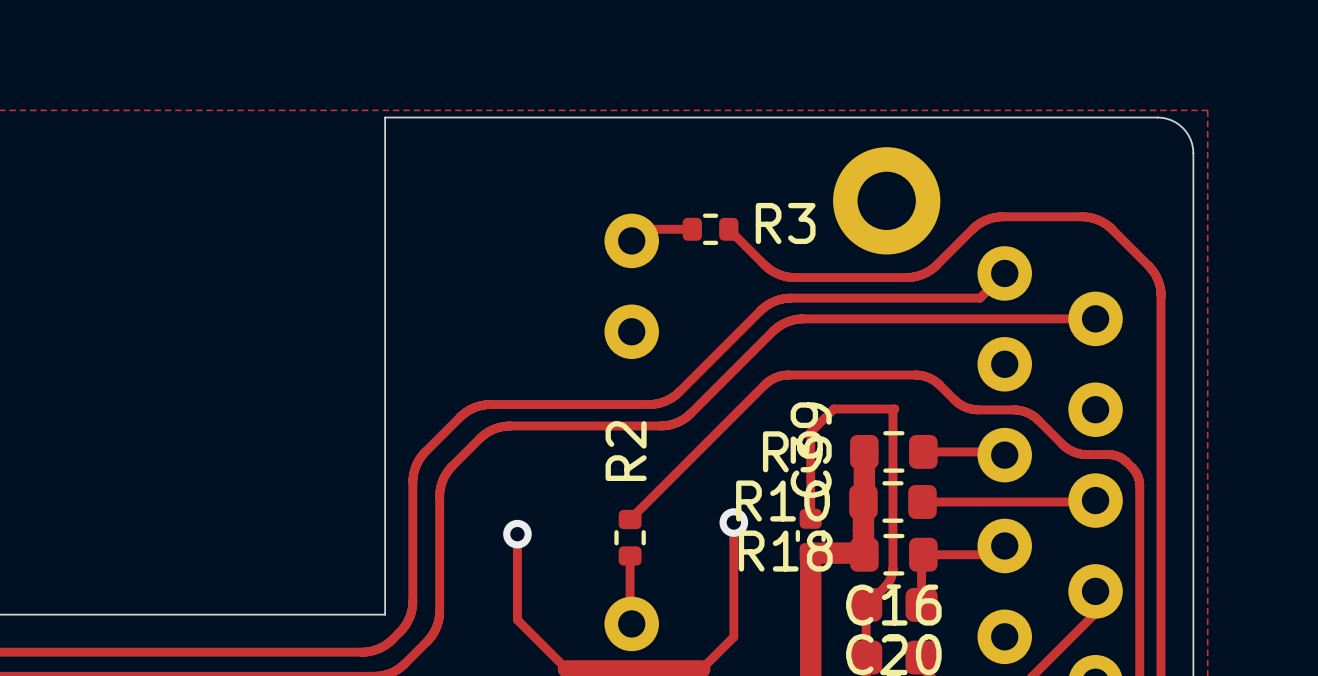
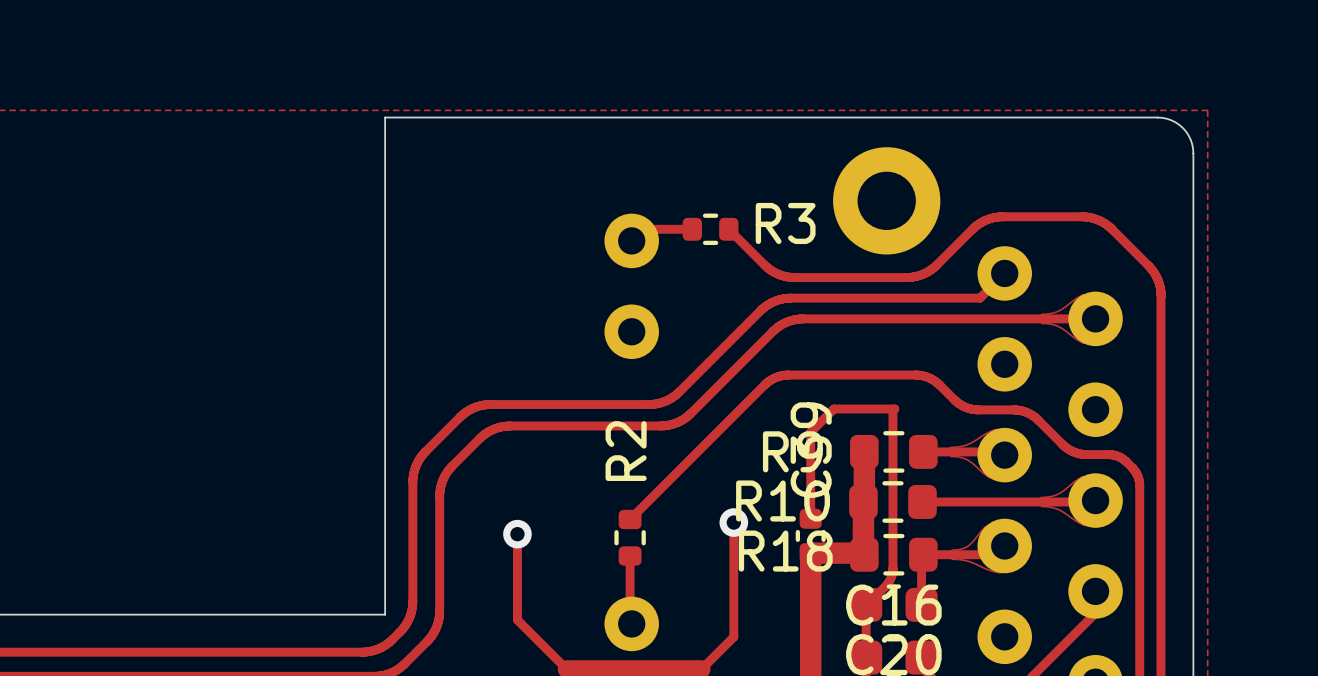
zone outline: none -> (1083, 294) (1109, 318) (1083, 343) (1057, 325) (1041, 323) (1041, 314) (1057, 311) (1083, 294)
zone outline: none -> (995, 429) (1018, 456) (990, 478) (969, 460) (950, 456) (950, 447) (967, 444) (995, 429)
zone outline: none -> (1082, 476) (1109, 499) (1084, 525) (1057, 509) (1040, 506) (1040, 497) (1056, 494) (1082, 476)
zone outline: none -> (985, 526) (1017, 541) (1001, 573) (969, 561) (951, 559) (951, 550) (968, 545) (985, 526)

